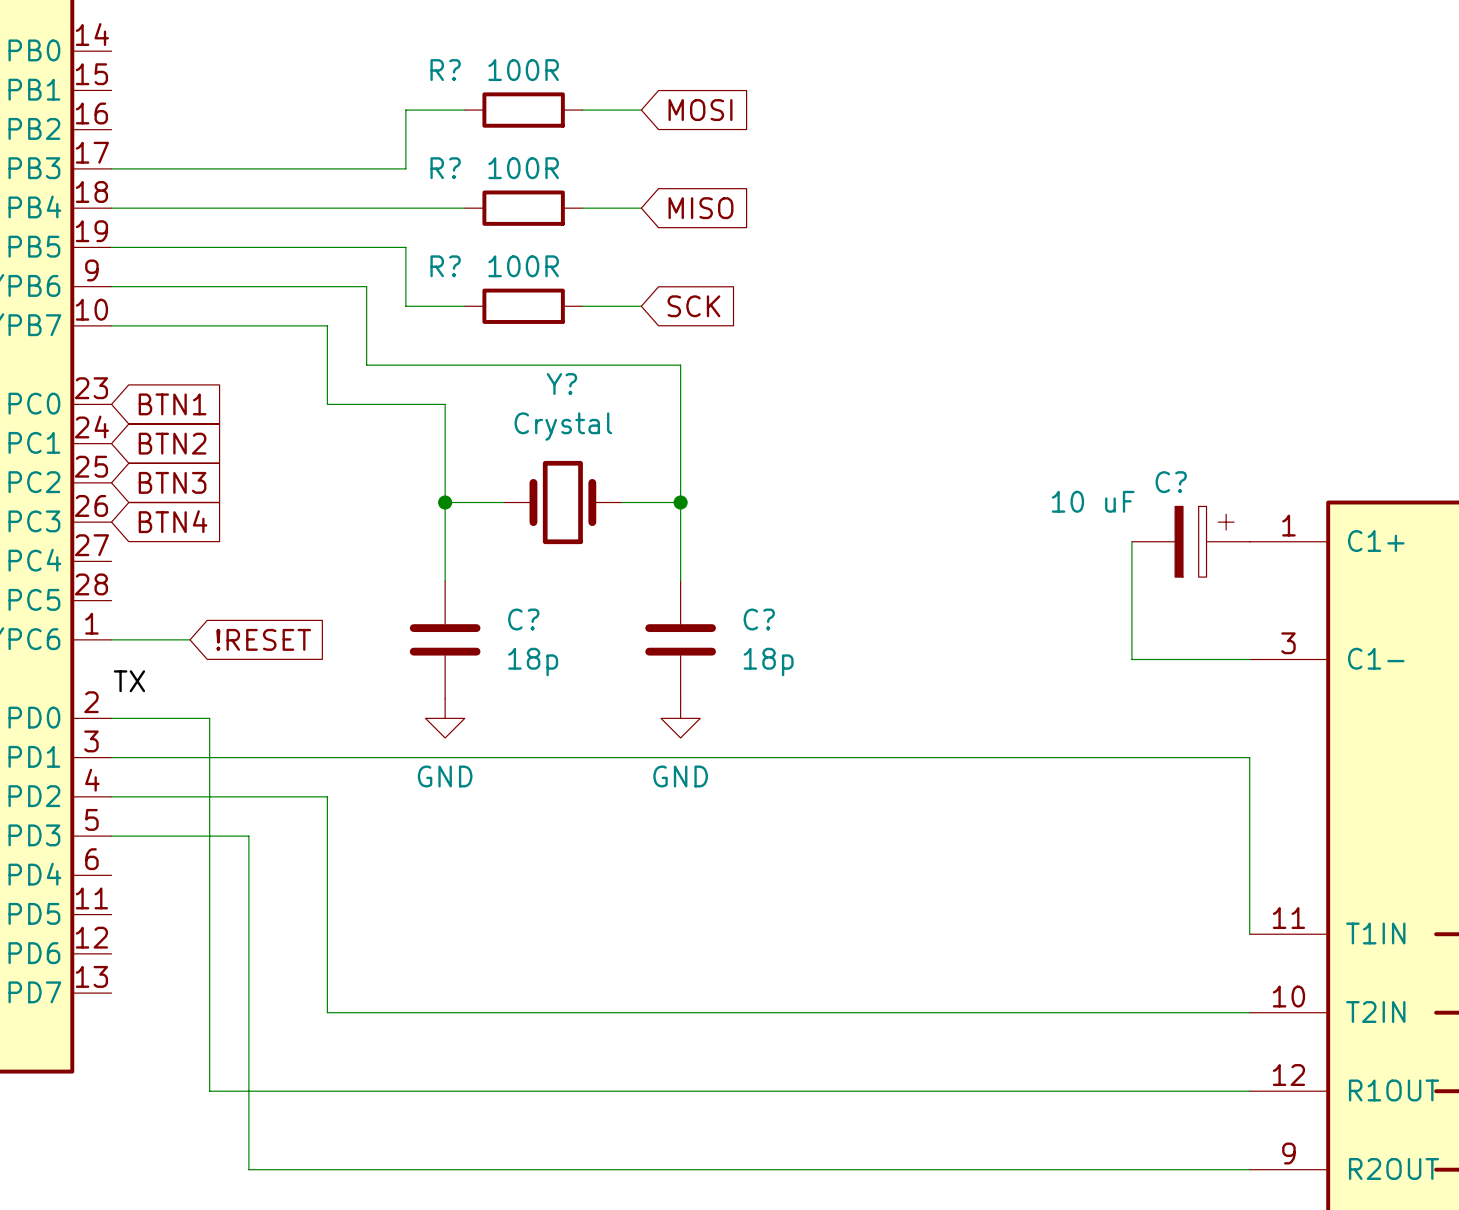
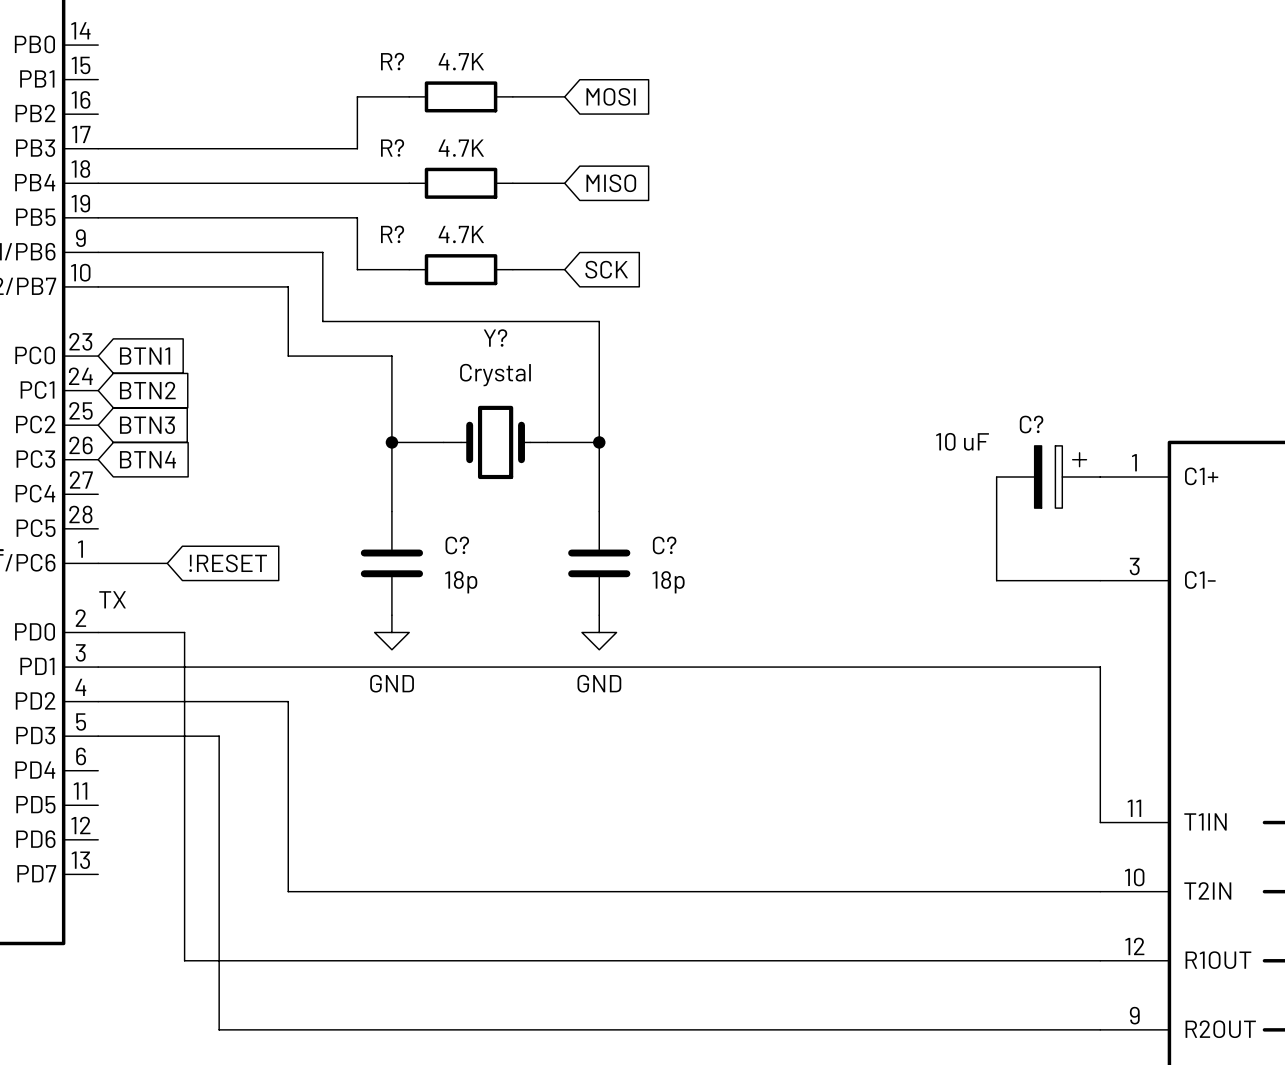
R? value: 100R (523, 70) -> 4.7K (461, 61)
R? value: 100R (523, 168) -> 4.7K (461, 148)
R? value: 100R (523, 266) -> 4.7K (461, 234)

